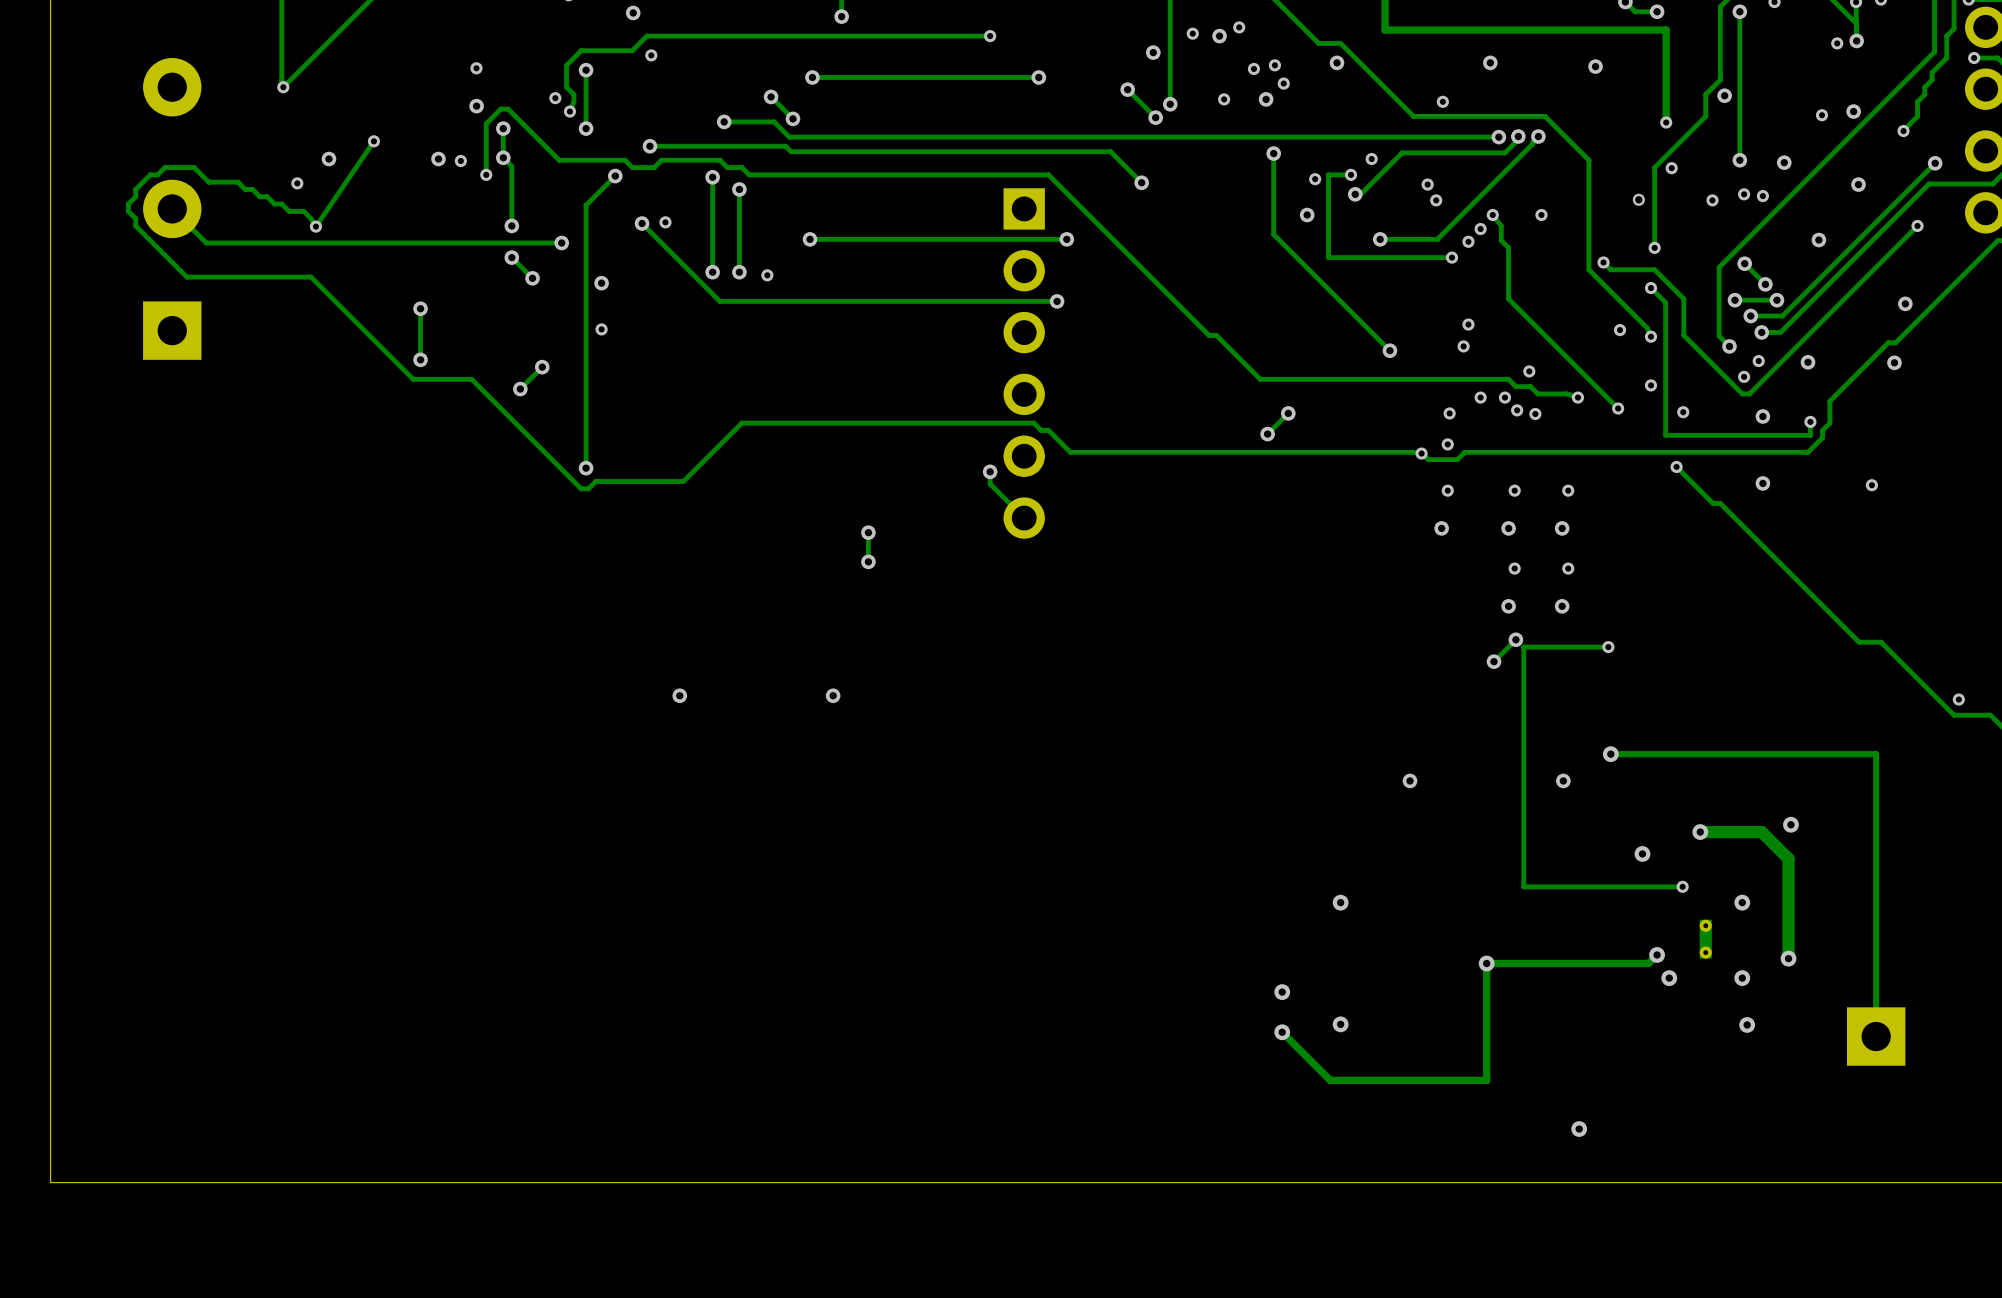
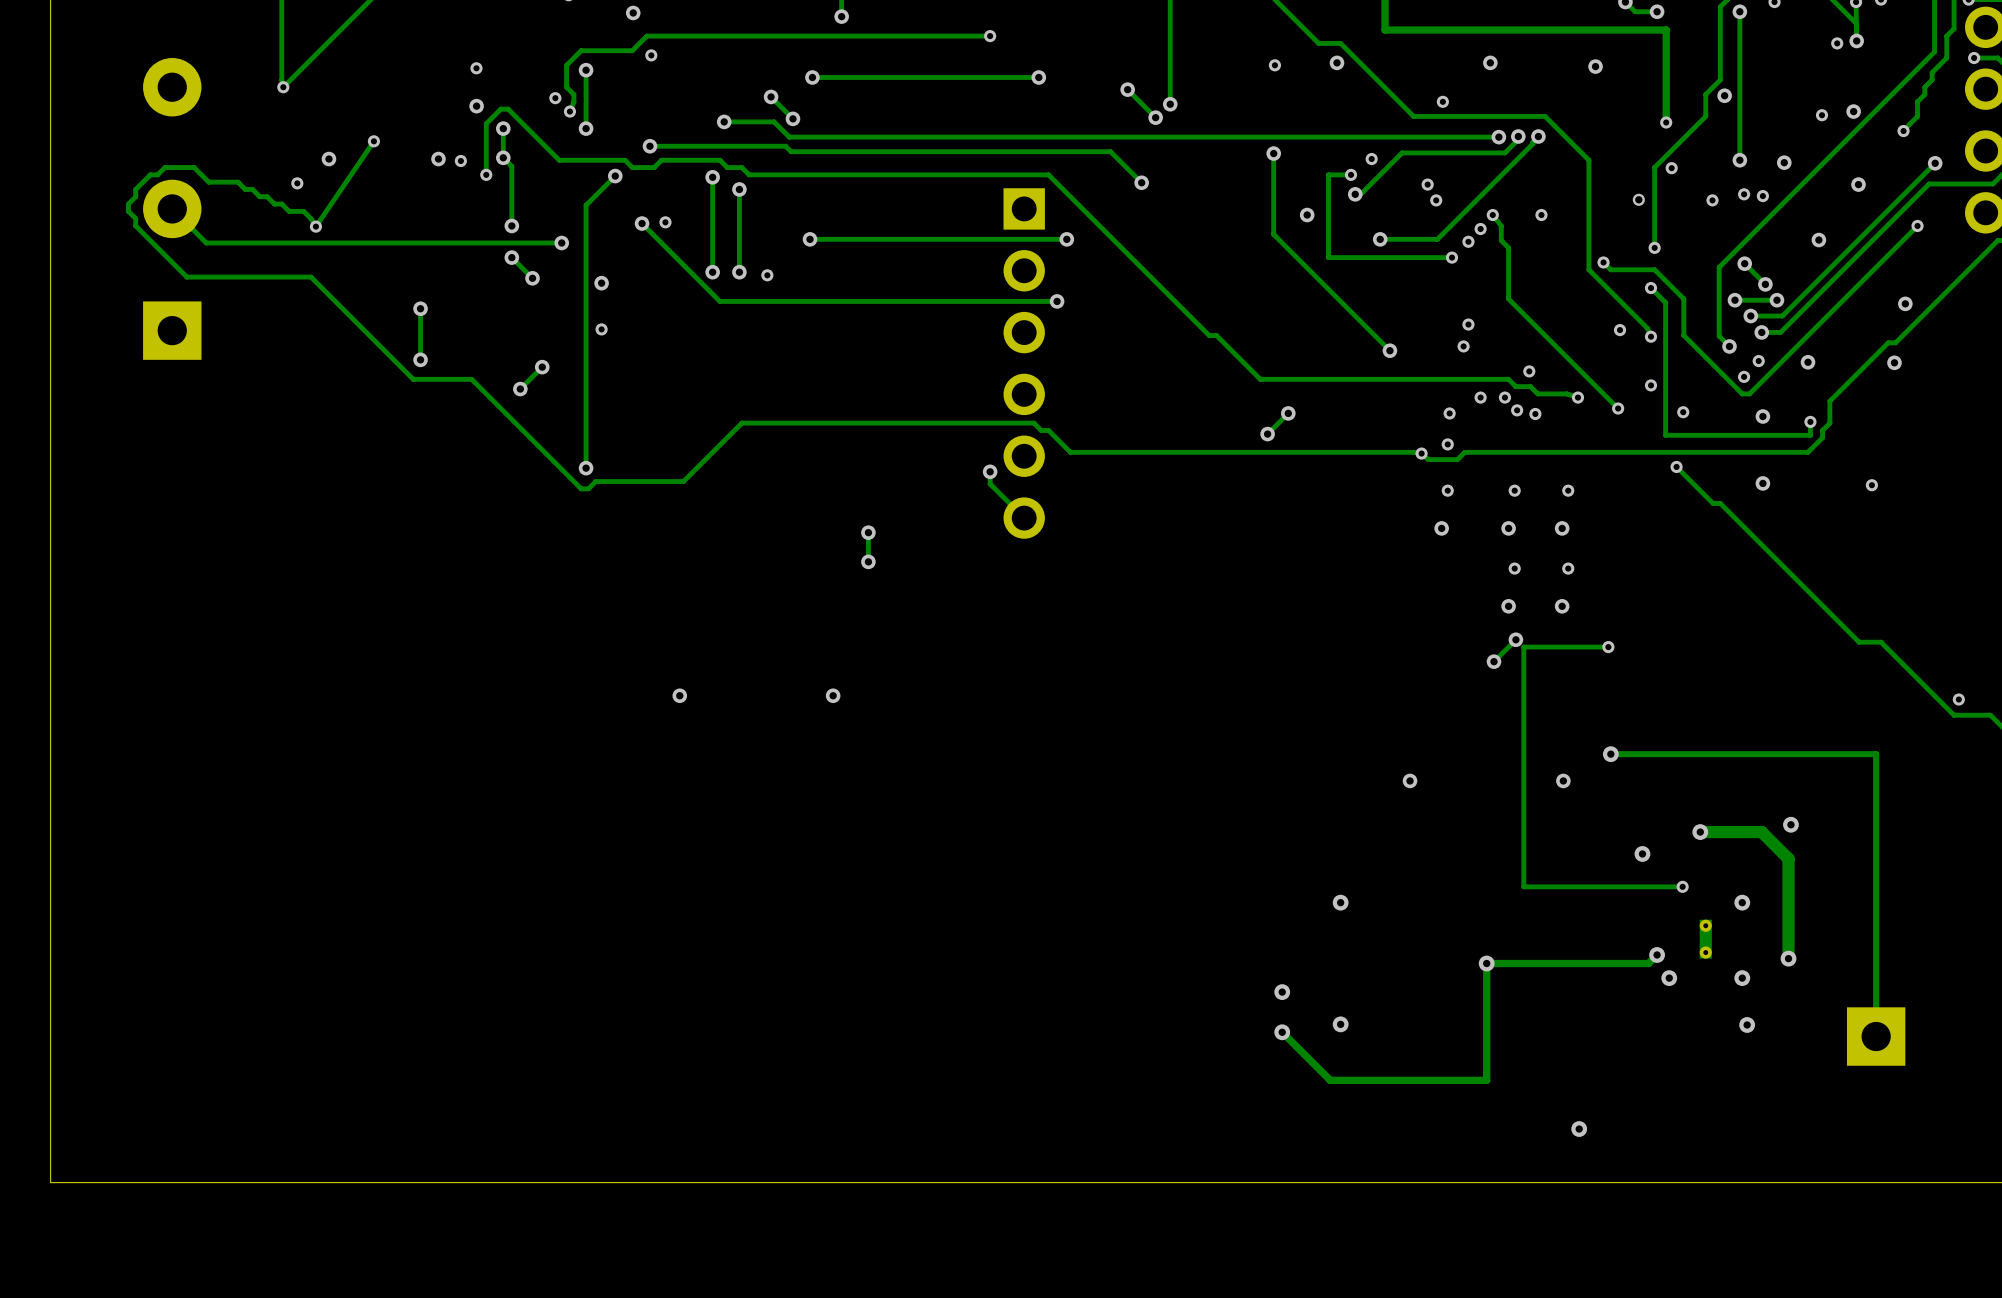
via: (1239, 27) -> none
via: (1192, 33) -> none
via: (1219, 36) -> none
via: (1153, 52) -> none
via: (1253, 68) -> none
via: (1283, 83) -> none
via: (1224, 99) -> none
via: (1266, 99) -> none
via: (1315, 179) -> none

